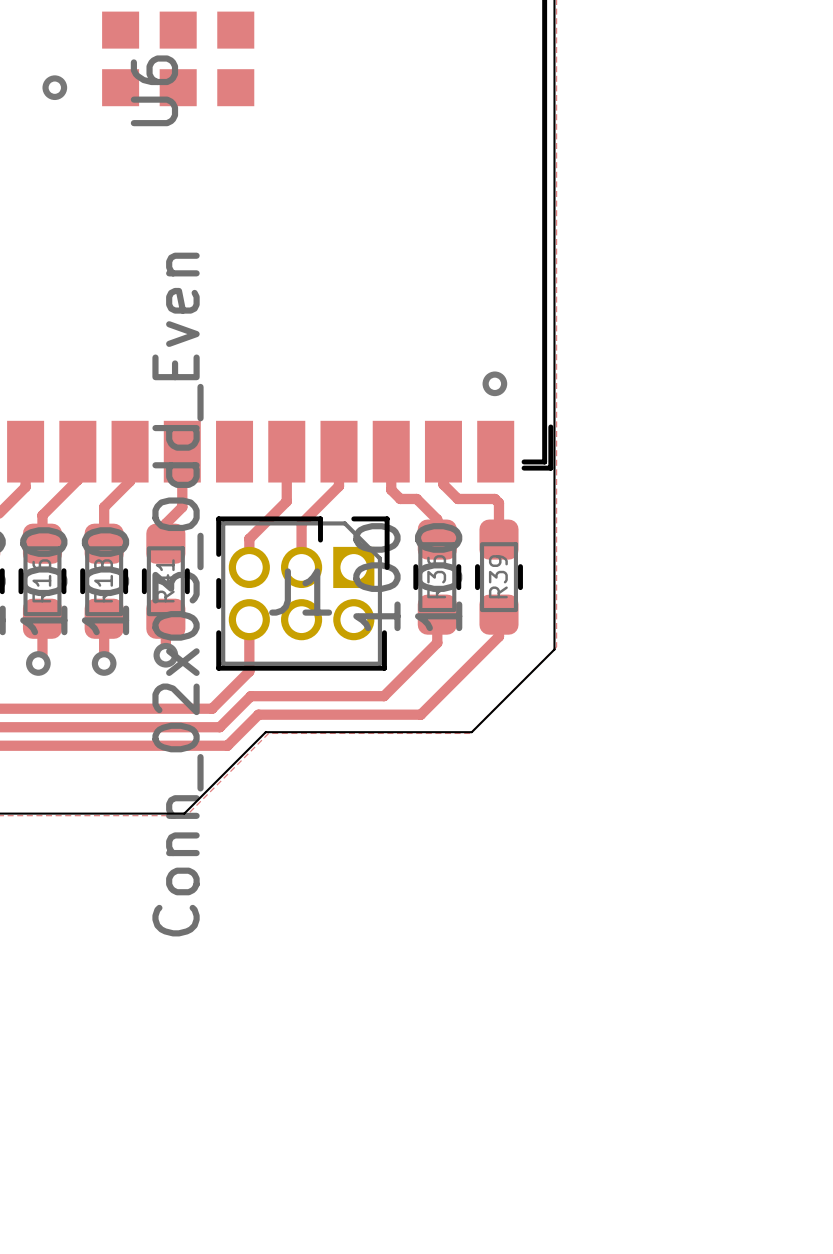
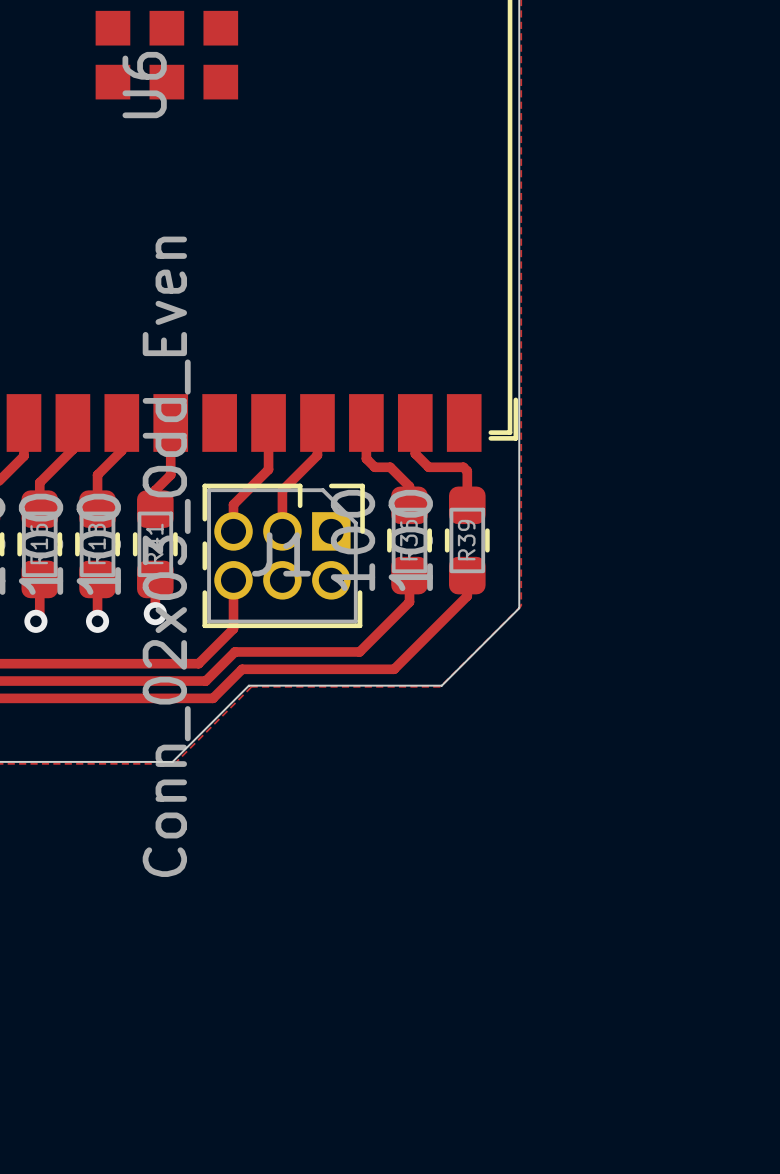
via: (54, 87) -> none
via: (494, 383) -> none

